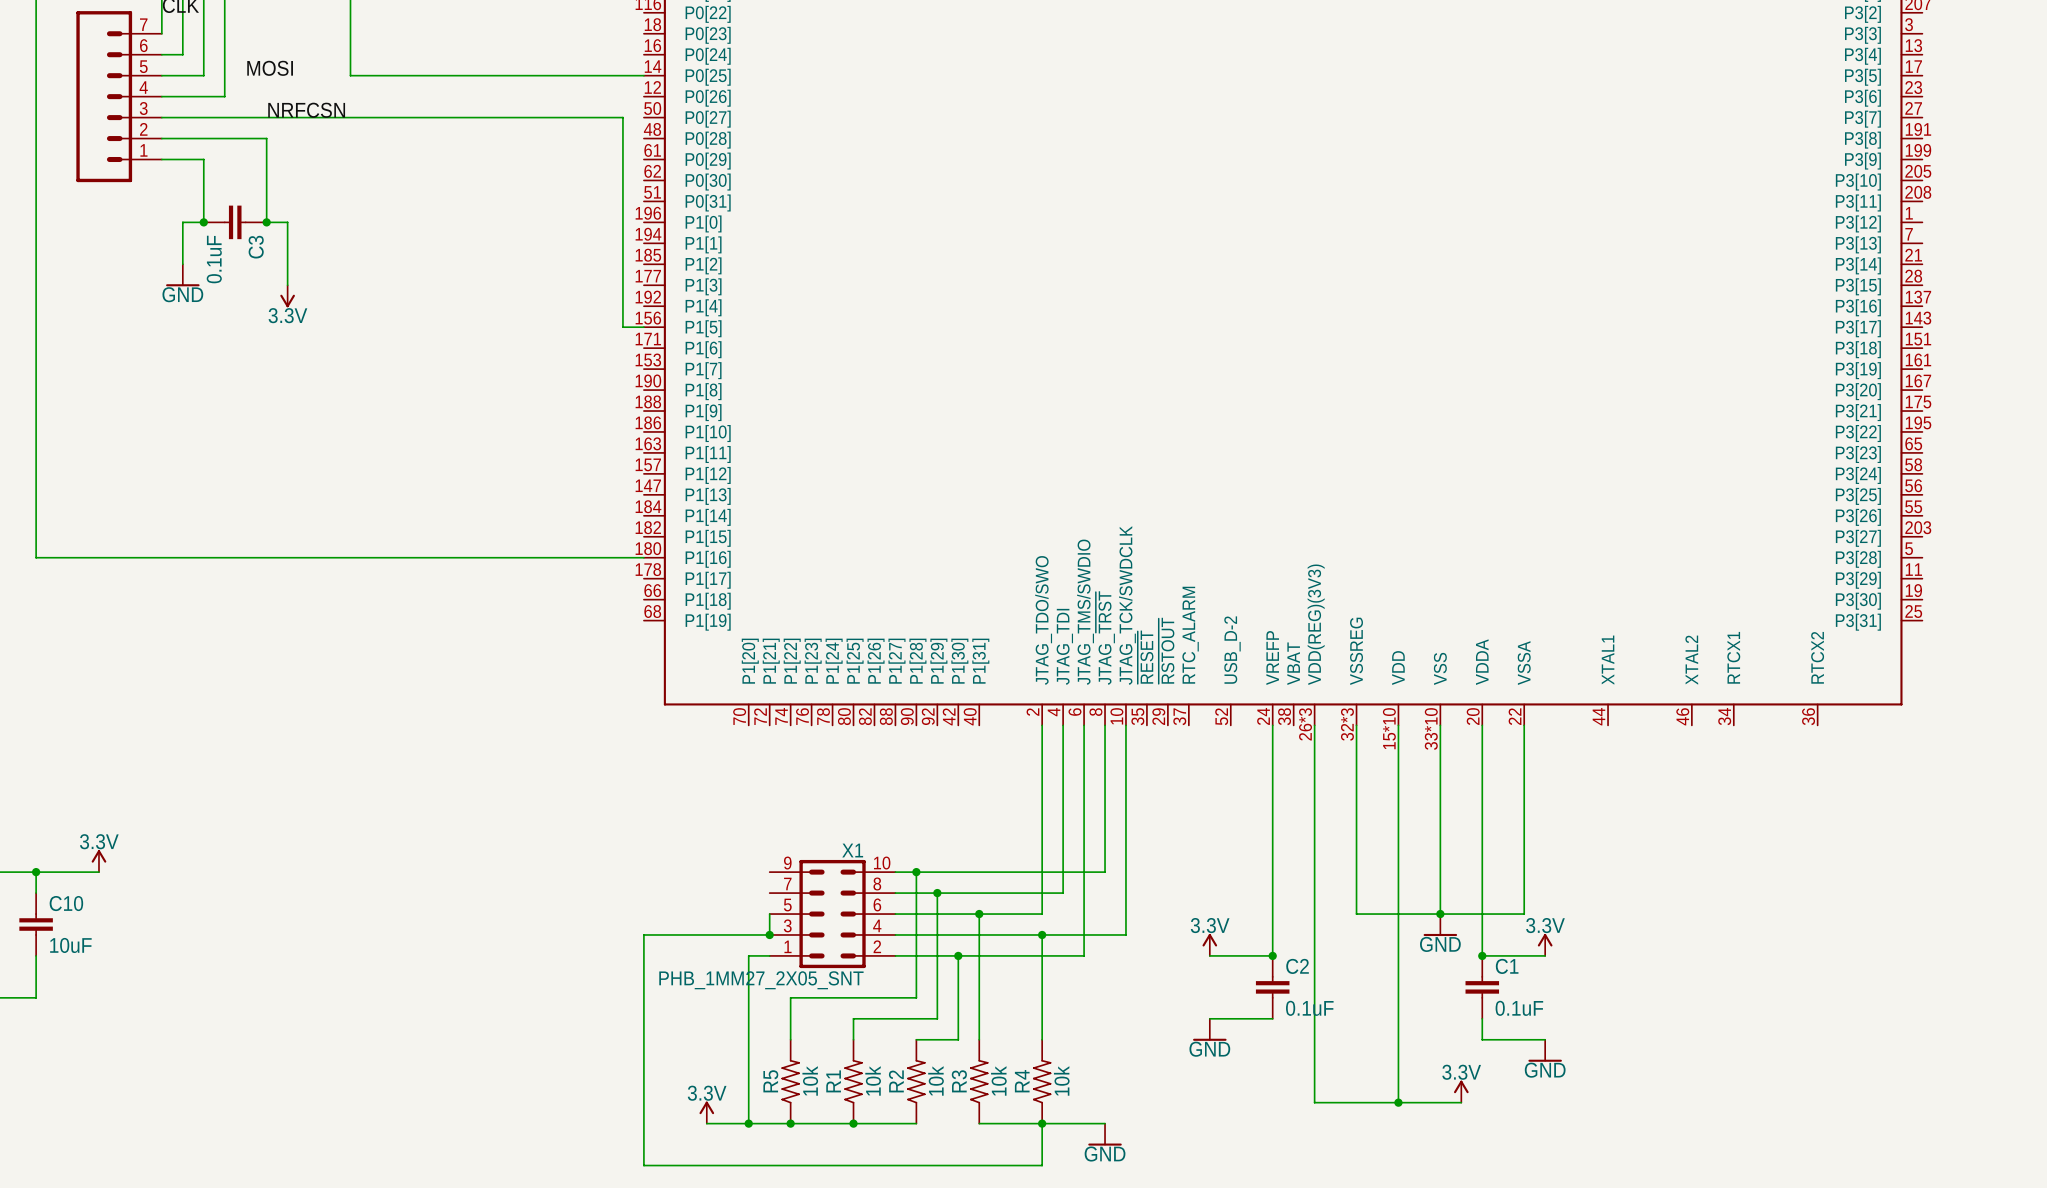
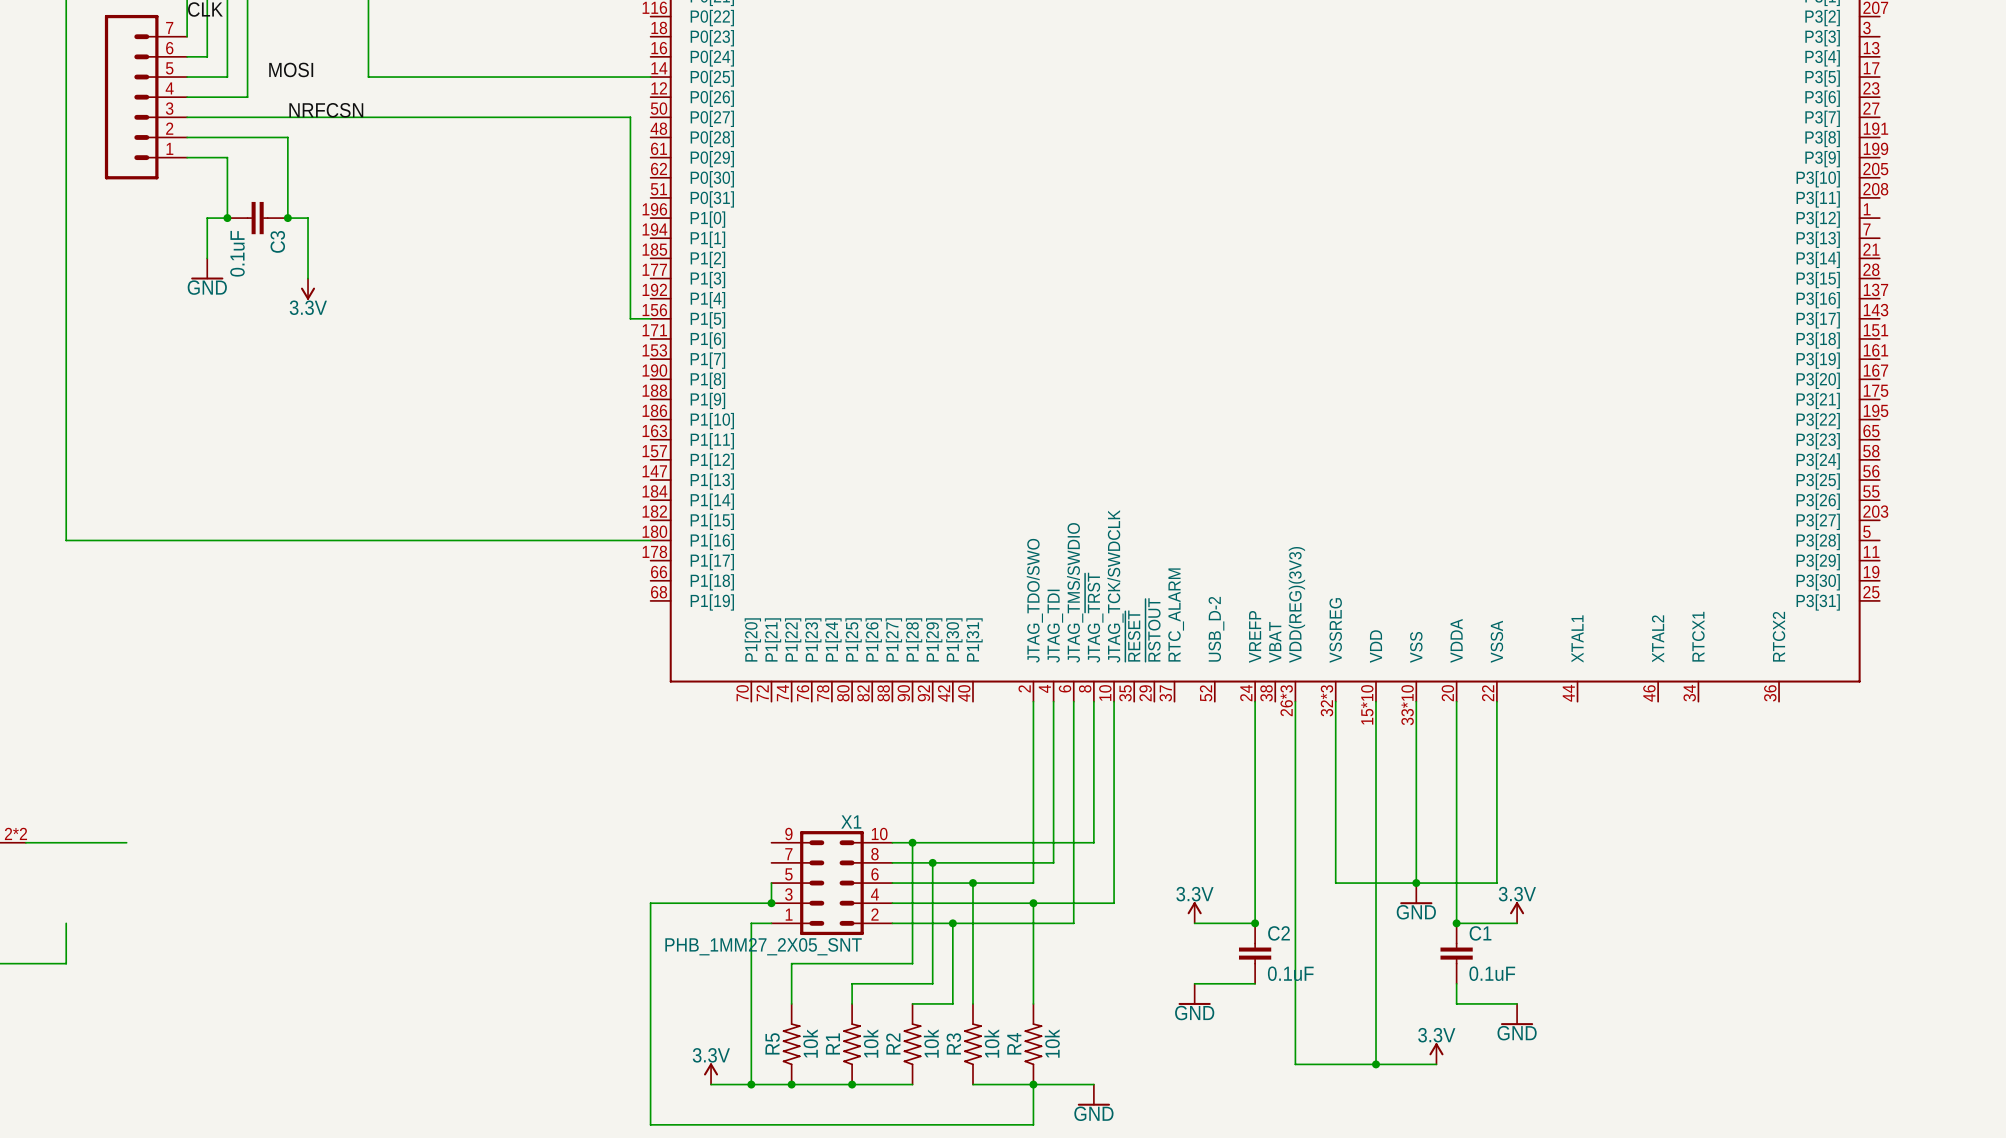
power symbol: 3.3V (98, 861) -> none
wire: (36, 872) (36, 893) -> none
junction: (36, 872) -> none
C10: 10uF (36, 924) -> none

